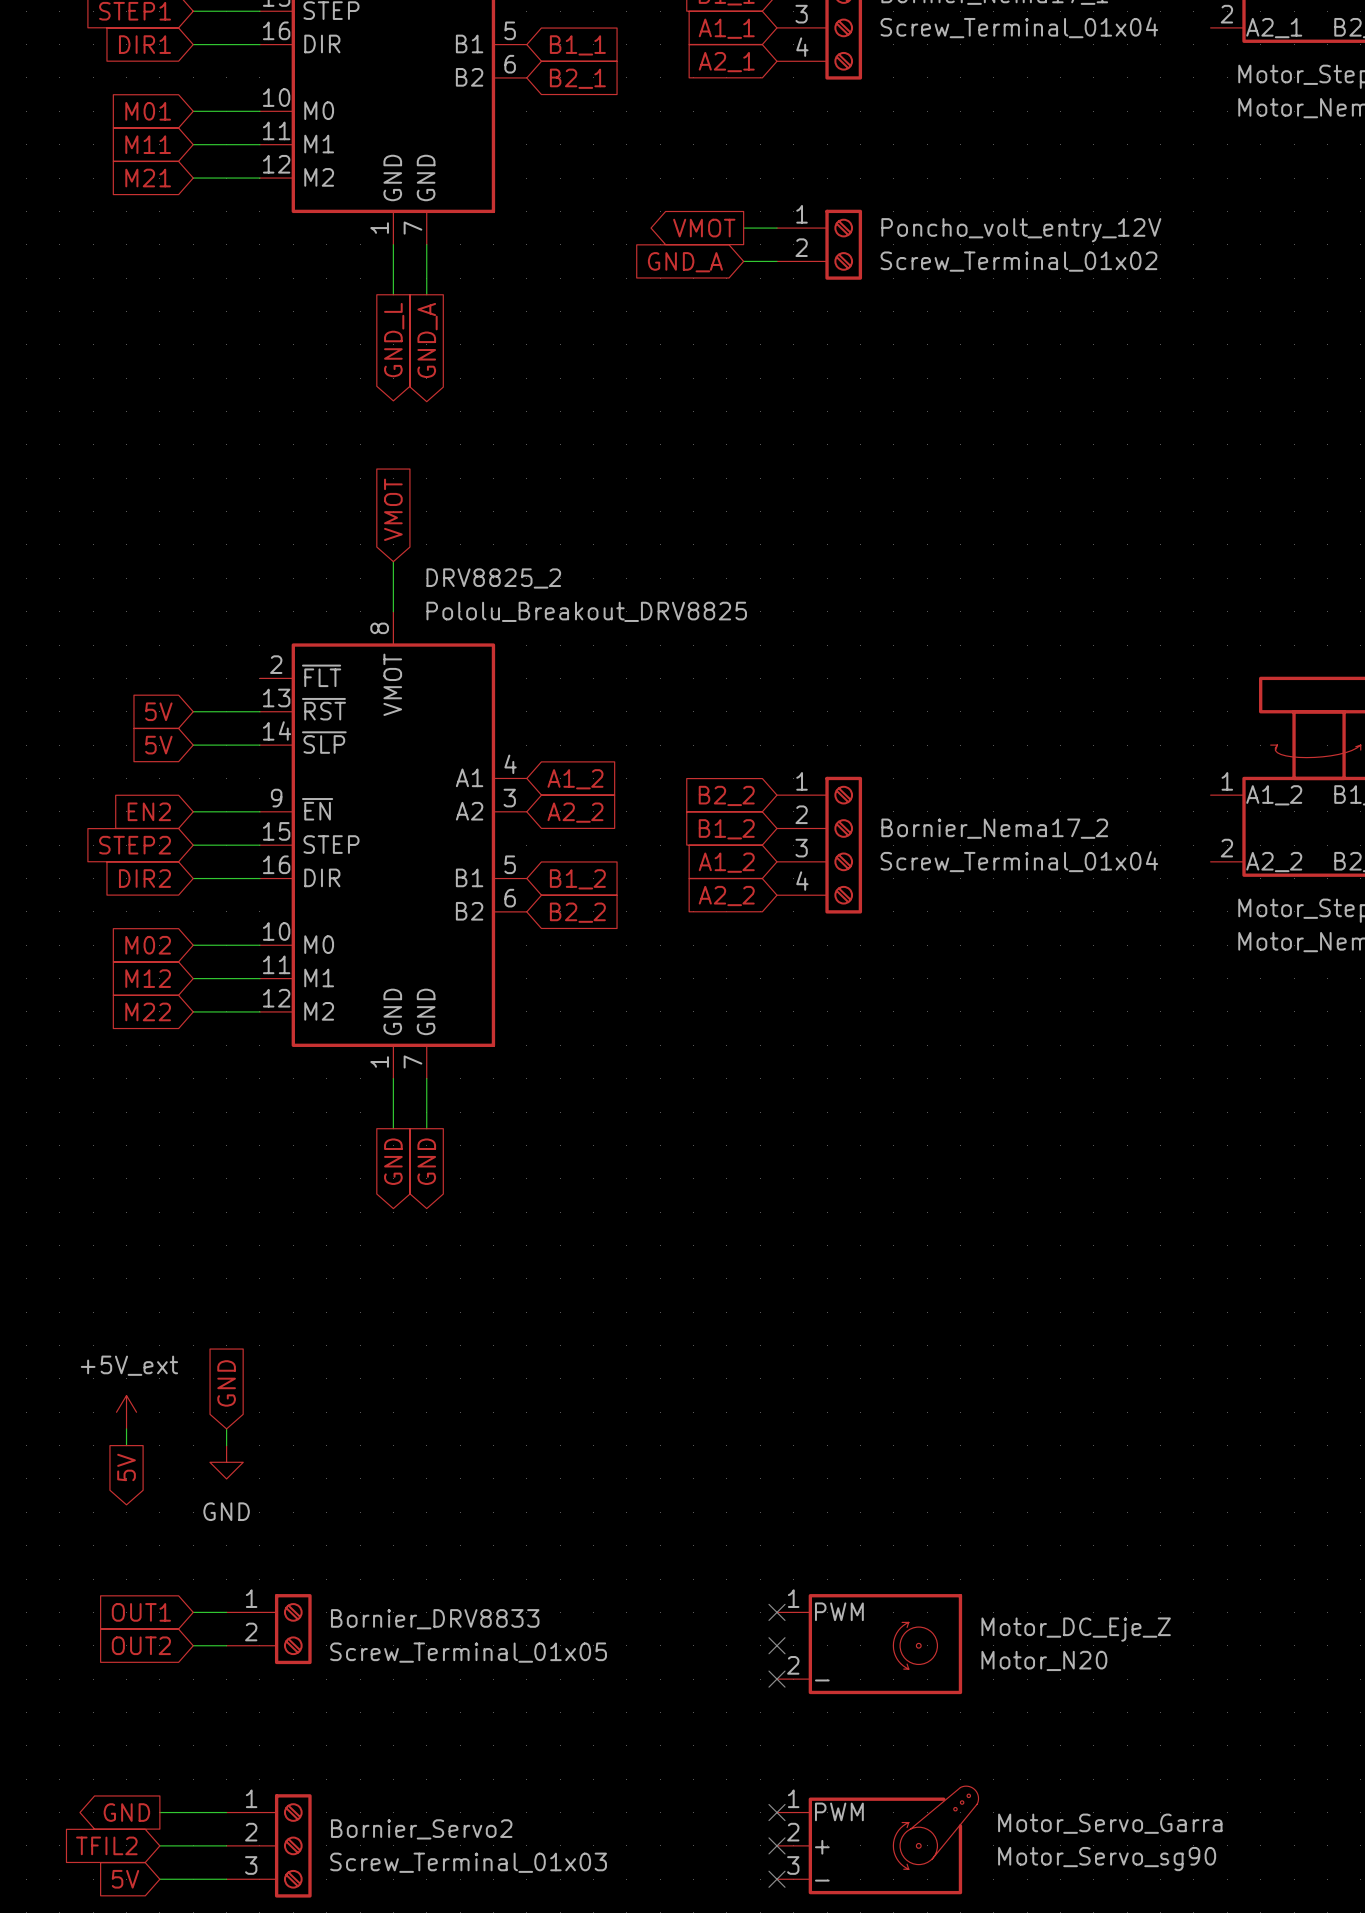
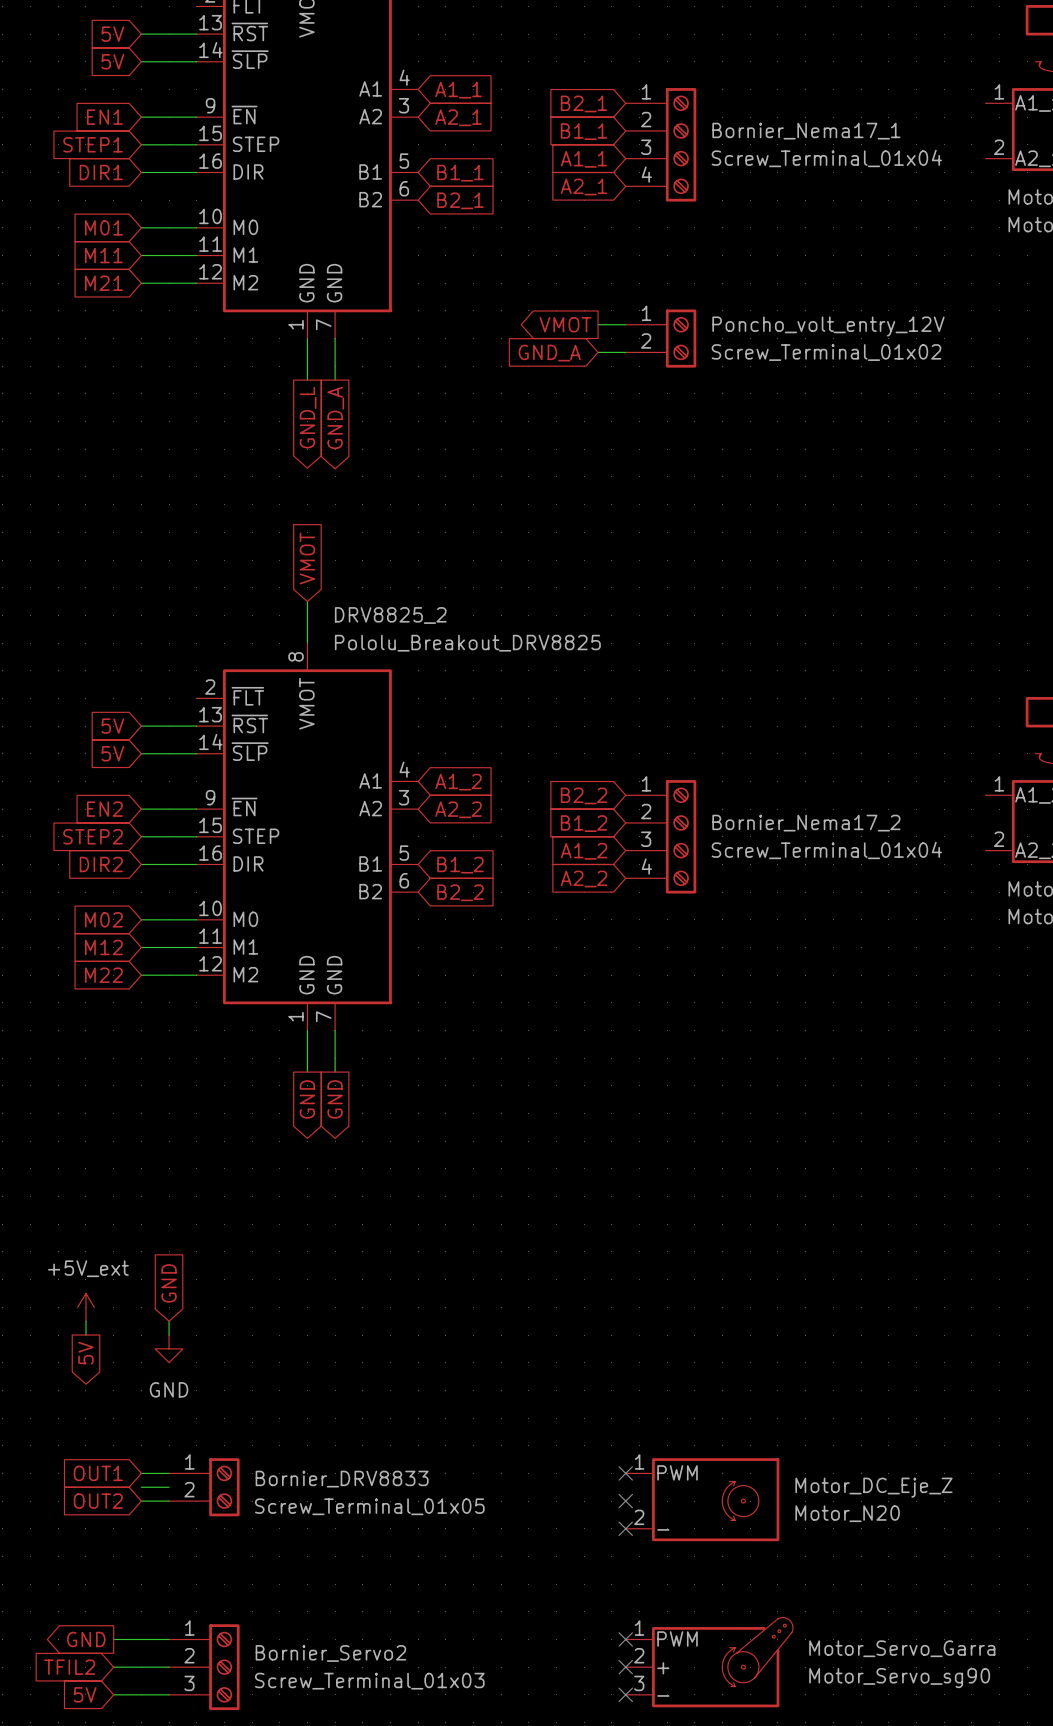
wire: none -> (141, 1487) (169, 1487)

